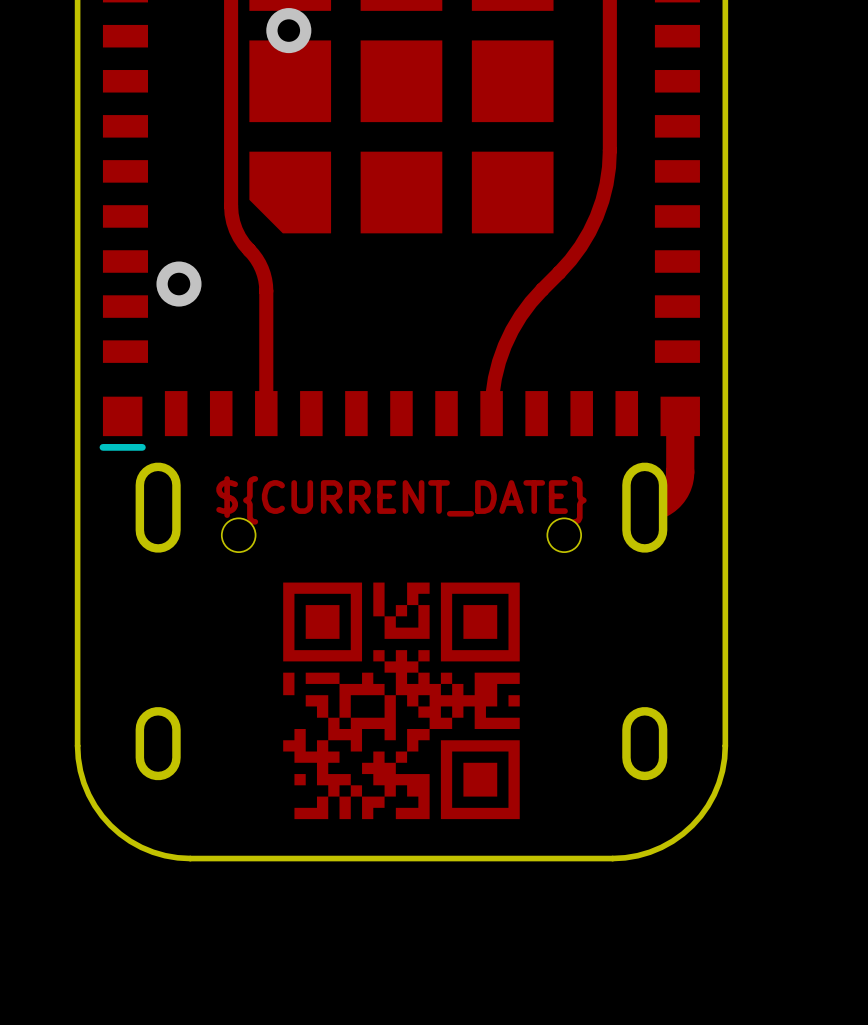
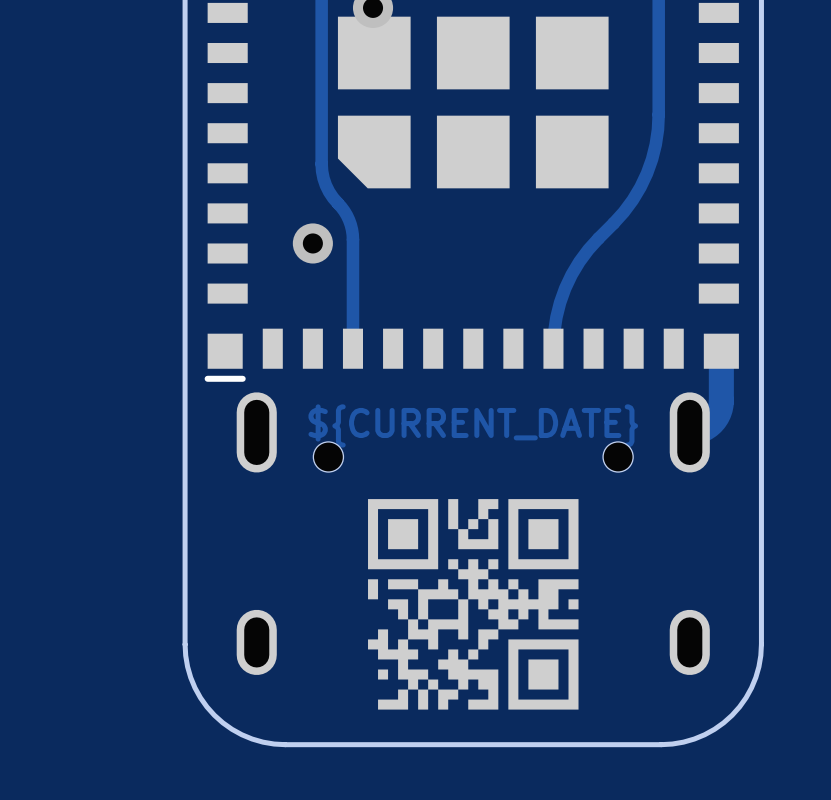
via position: (178, 284) -> (312, 243)

